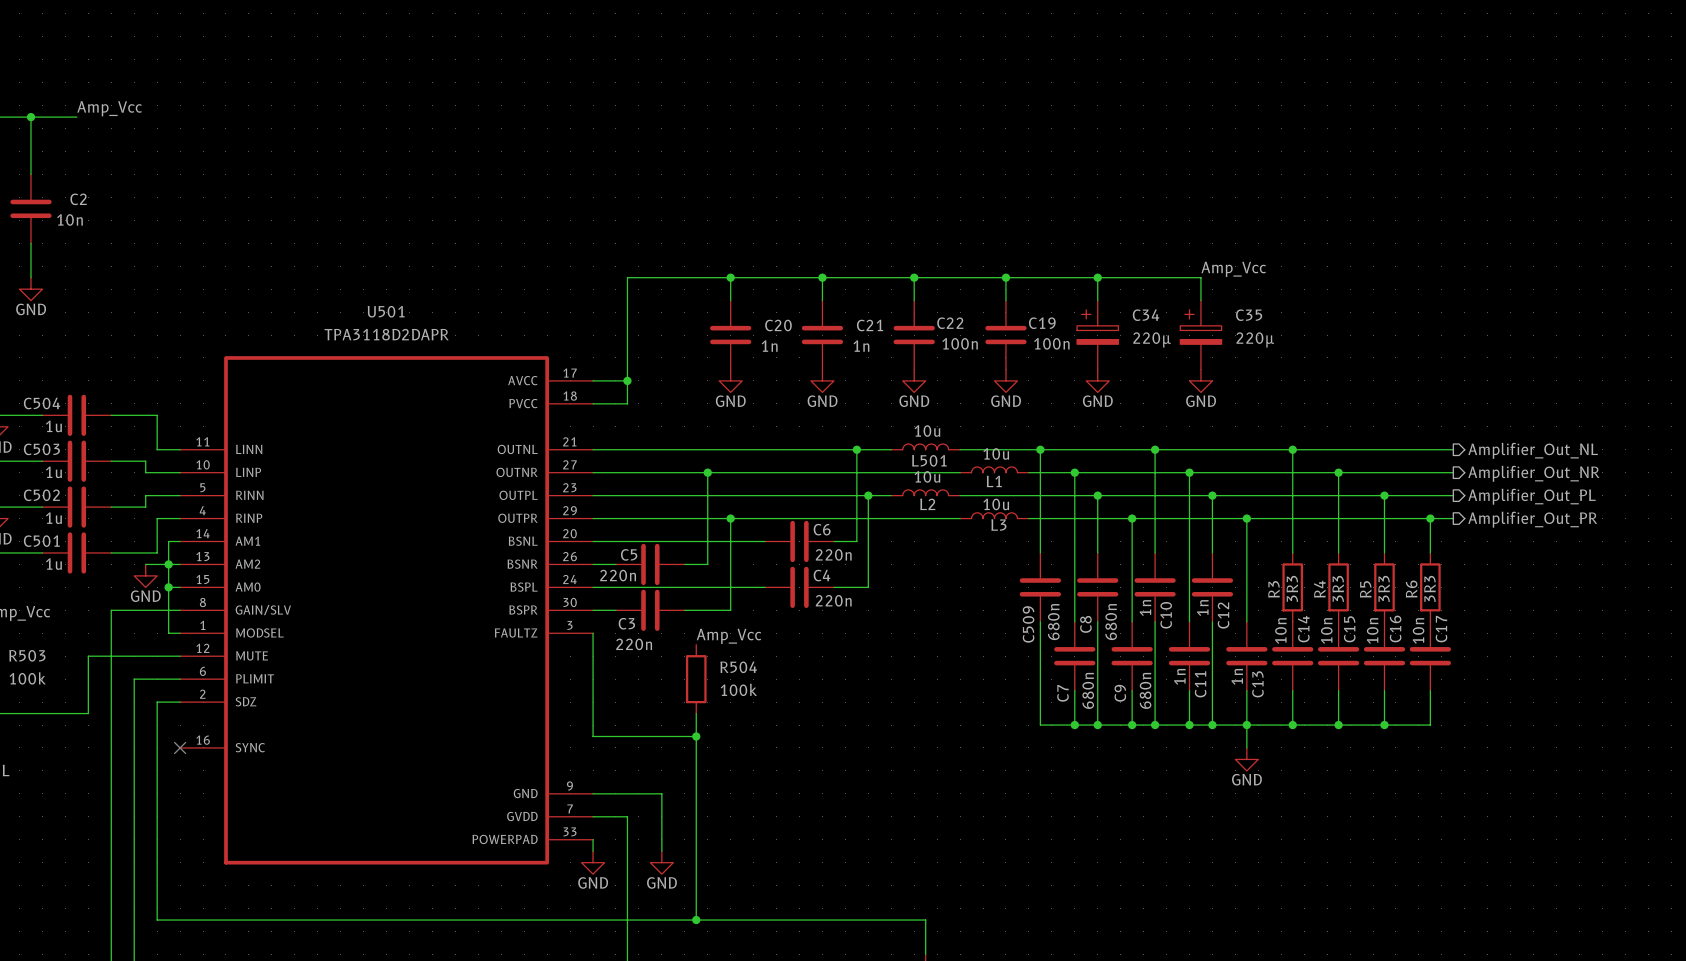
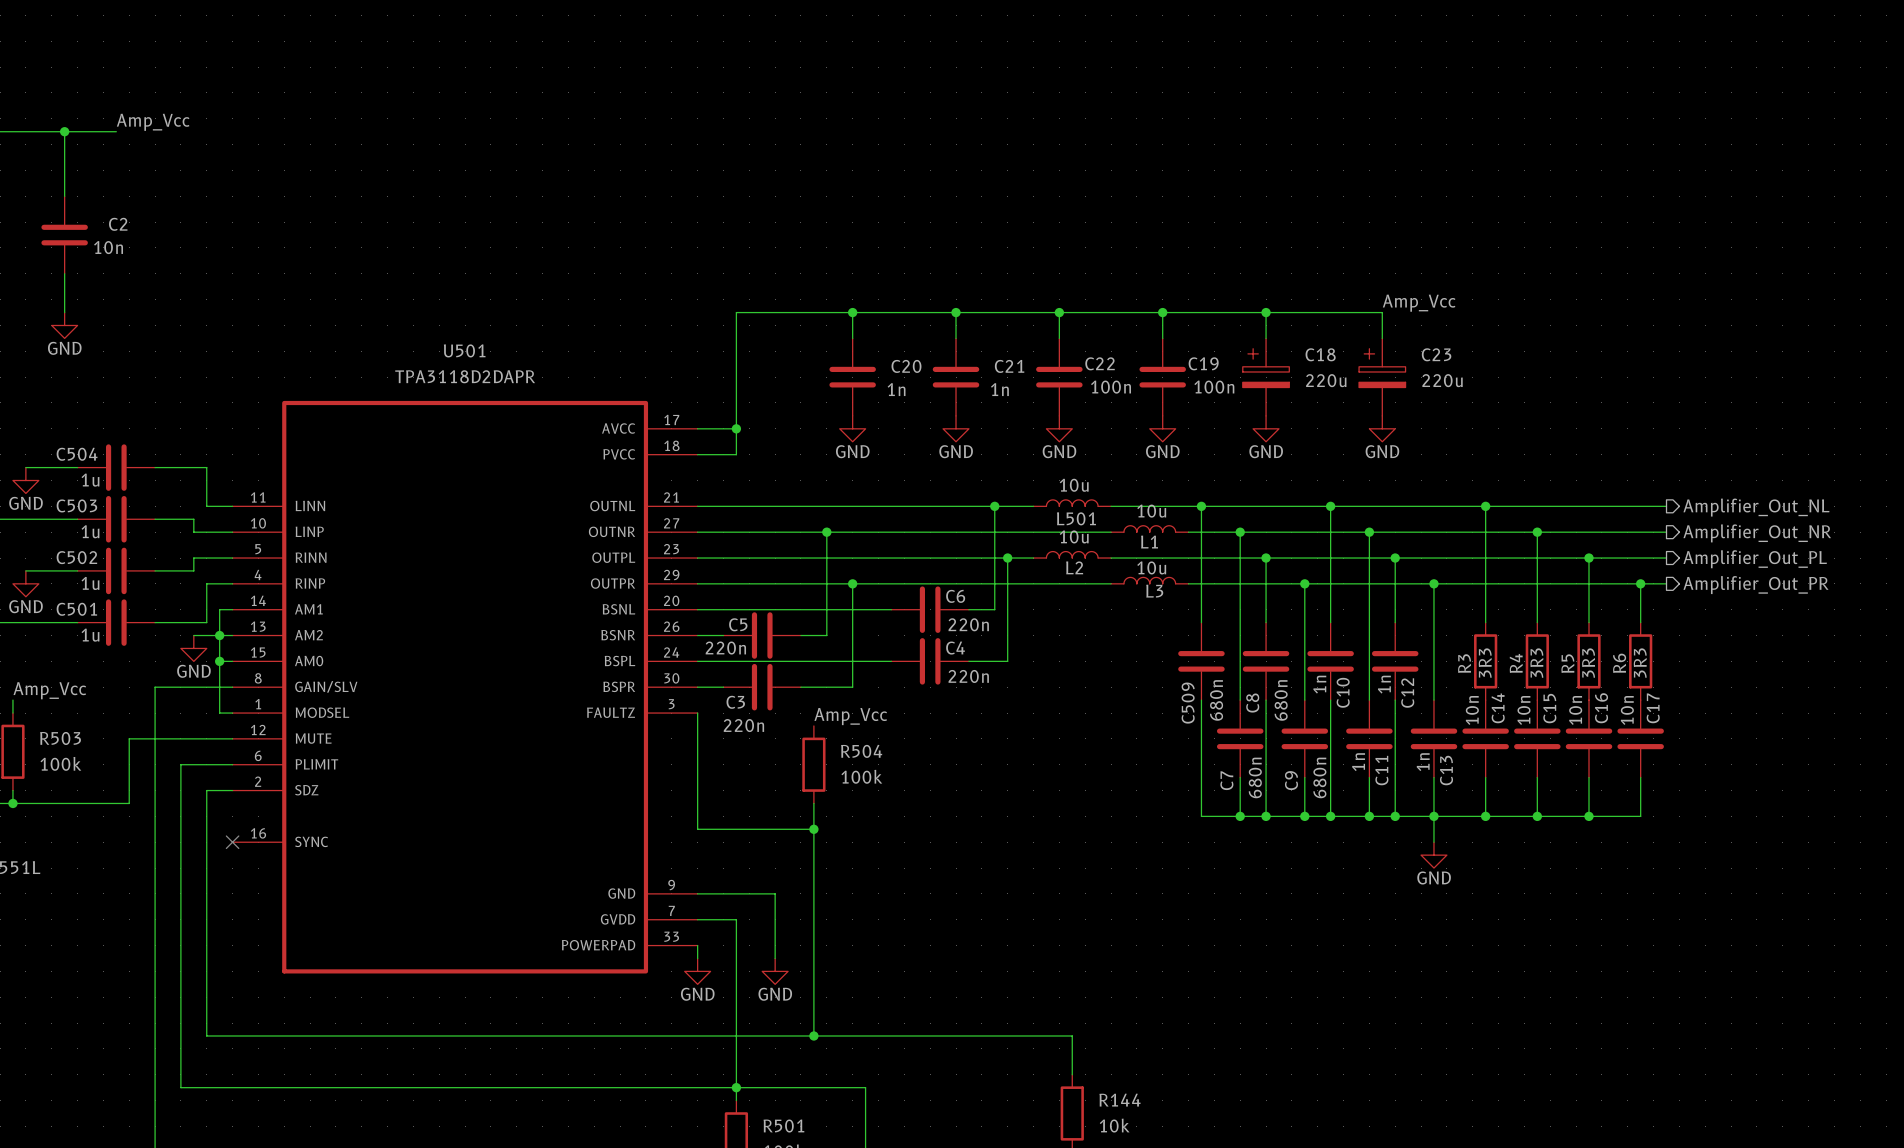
C34 name: C34 (1146, 315) -> C18 (1320, 354)
C35 name: C35 (1249, 315) -> C23 (1436, 354)
C34 value: 220µ (1152, 339) -> 220u (1326, 380)
C35 value: 220µ (1255, 339) -> 220u (1442, 380)

